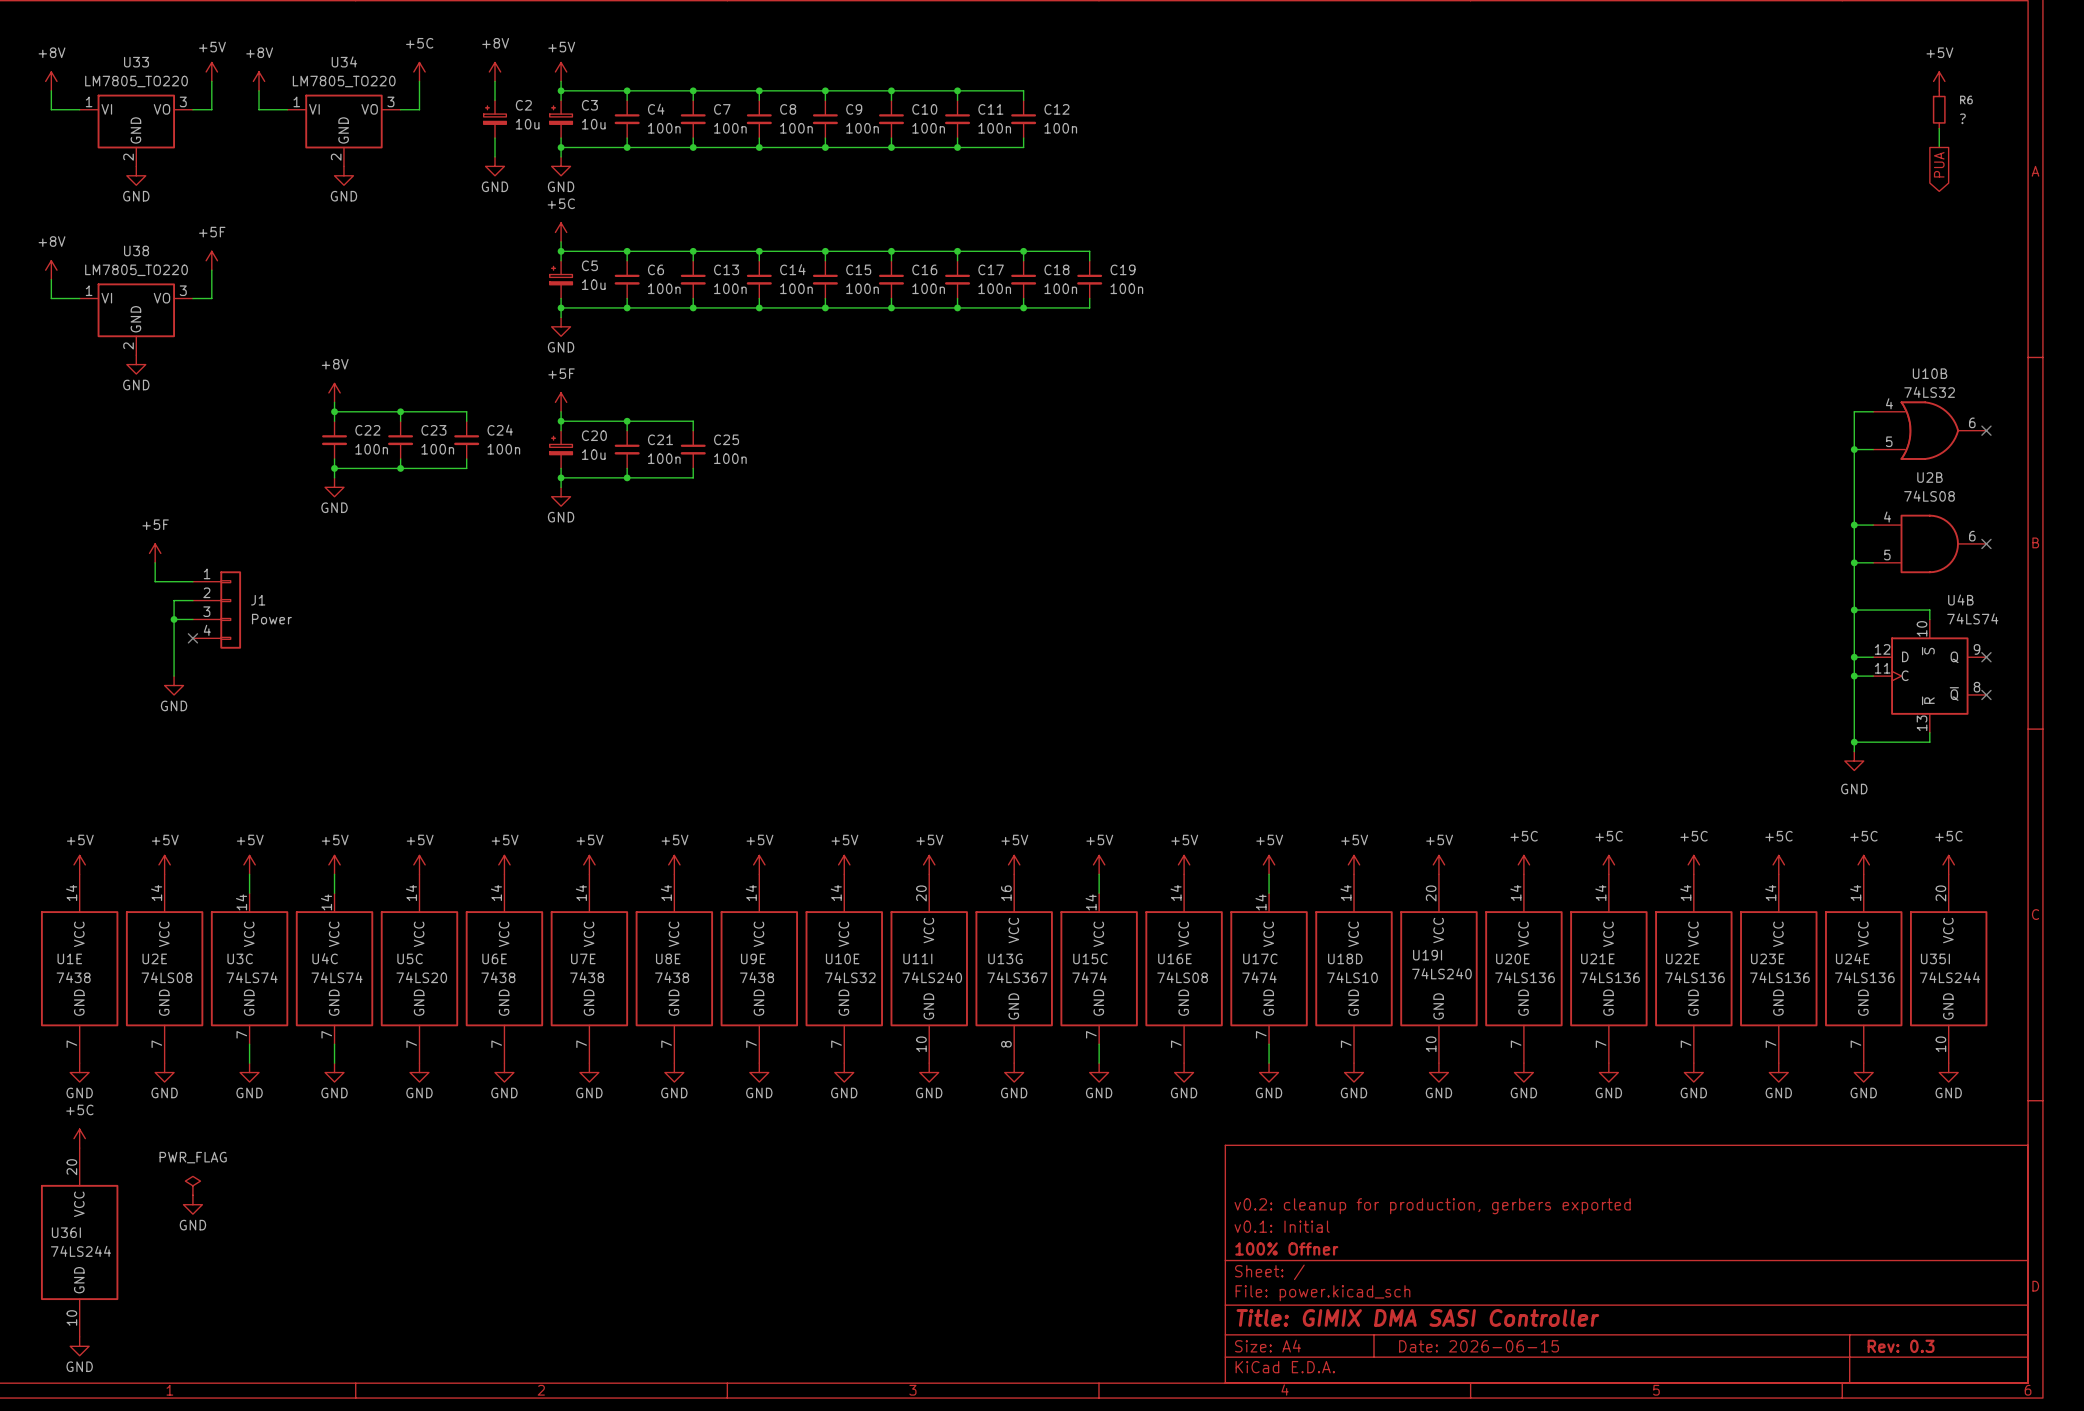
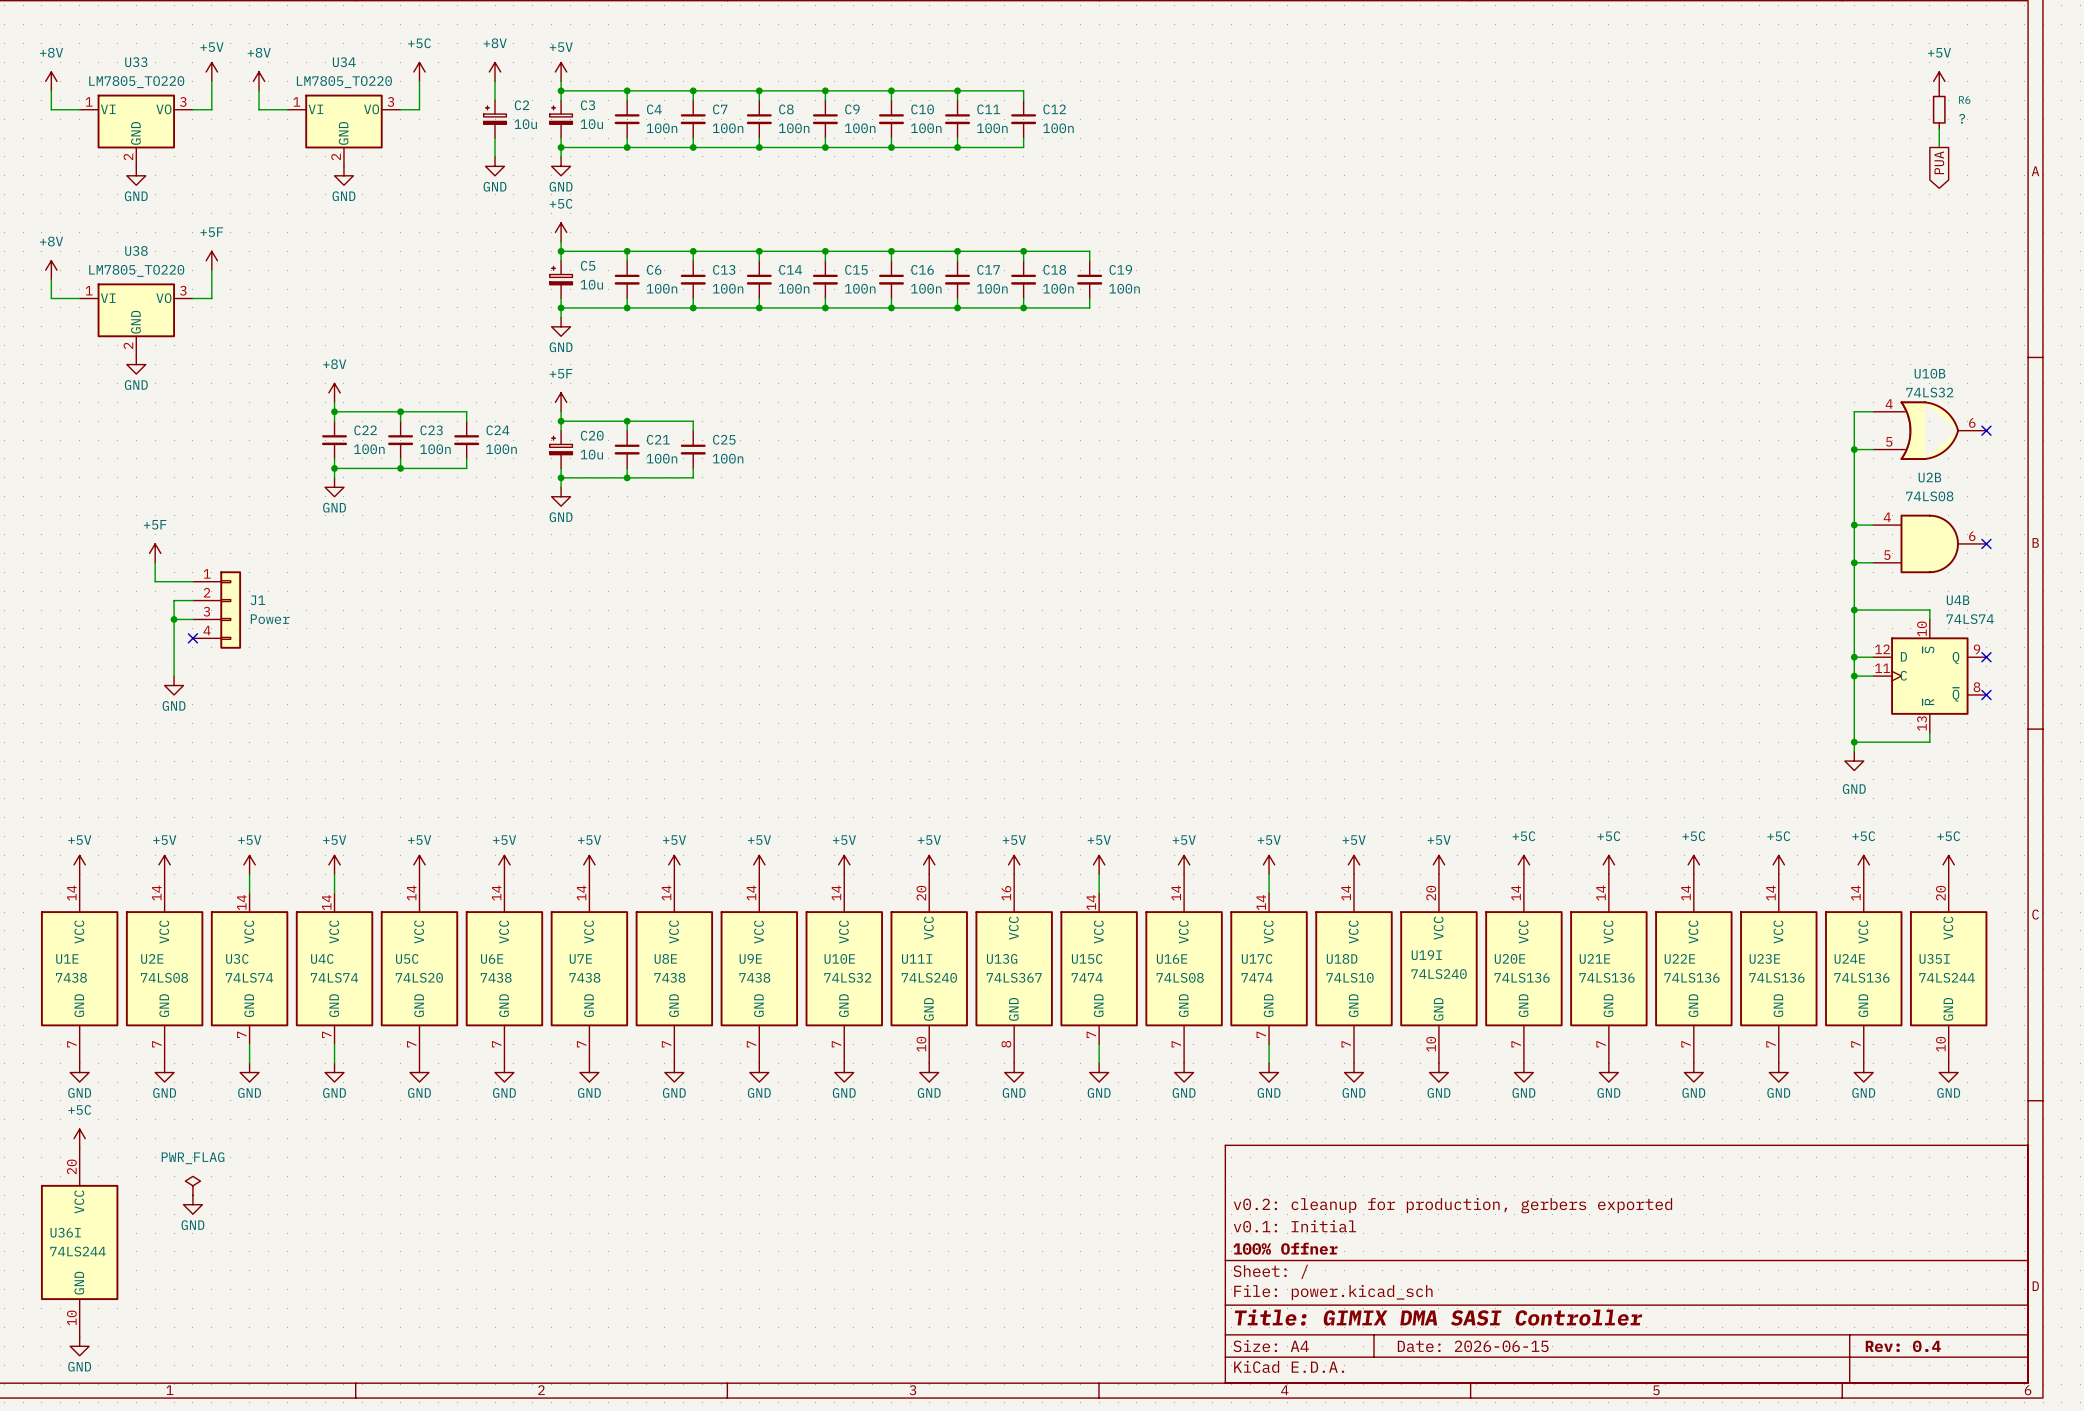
title block: Rev: 0.3 (1901, 1346) -> Rev: 0.4 (1903, 1346)

